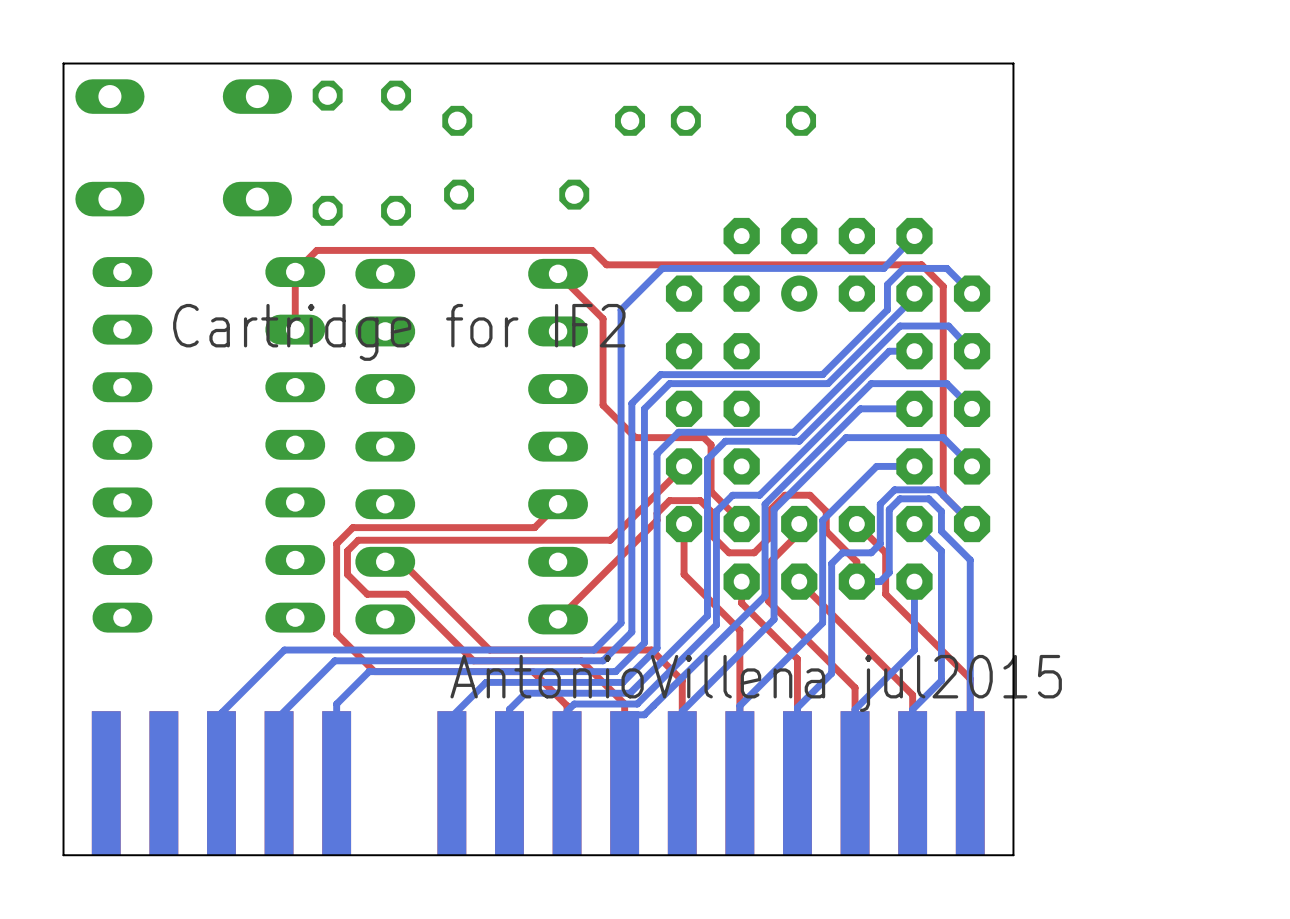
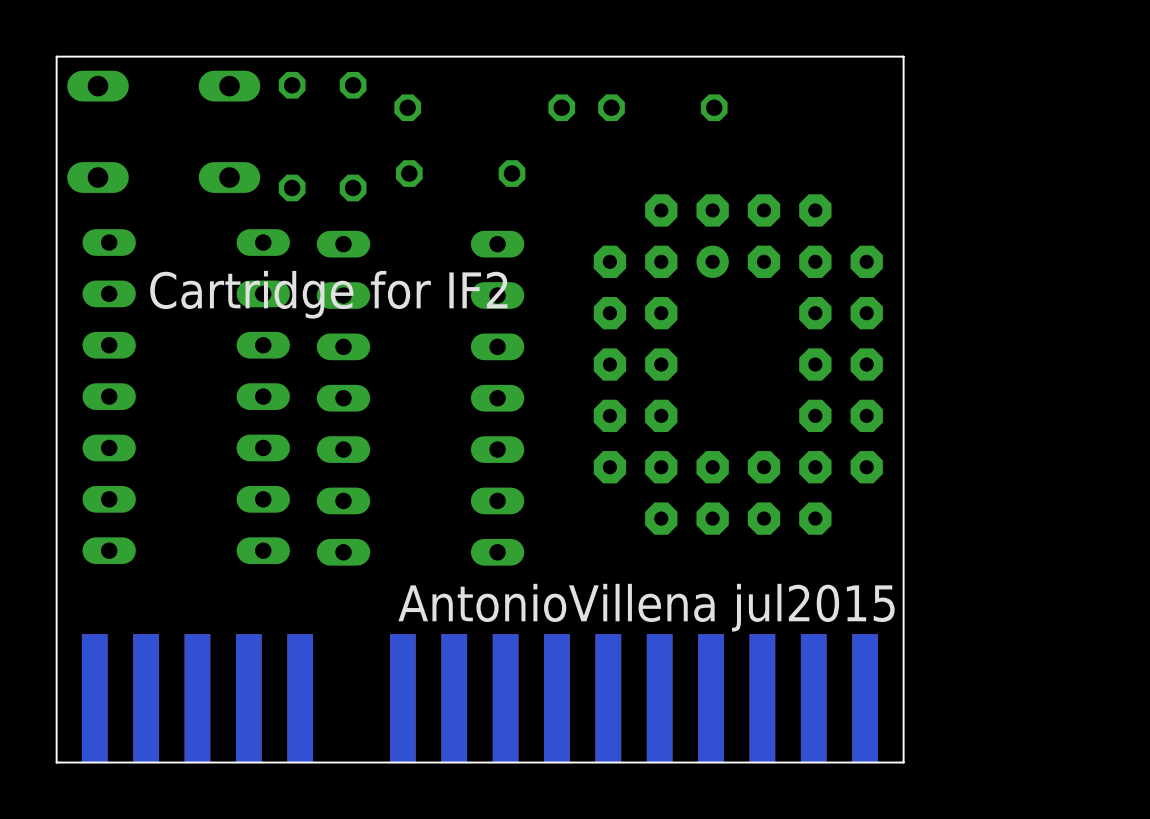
bottom track: (914, 236) (883, 268) (662, 268) (621, 309) (621, 623) (594, 650) (284, 650) (221, 713) (221, 783) -> none
top track: (558, 273) (603, 318) (603, 405) (635, 437) (703, 437) (711, 444) (711, 491) (741, 524) -> none
bottom track: (914, 293) (914, 297) (828, 383) (669, 383) (644, 408) (644, 642) (615, 671) (369, 671) (336, 704) (336, 783) -> none
bottom track: (972, 293) (946, 268) (903, 268) (887, 284) (887, 309) (822, 374) (660, 374) (631, 403) (631, 632) (603, 660) (334, 660) (279, 716) (279, 783) -> none
top track: (295, 329) (295, 272) (316, 250) (592, 250) (606, 264) (921, 264) (943, 286) (943, 495) (972, 524) -> none
bottom track: (914, 351) (889, 351) (799, 441) (725, 441) (707, 459) (707, 615) (630, 693) (525, 693) (509, 709) (509, 783) -> none
bottom track: (972, 351) (948, 326) (900, 326) (793, 432) (678, 432) (657, 453) (657, 648) (622, 682) (486, 682) (451, 716) (451, 783) -> none
bottom track: (914, 408) (860, 408) (765, 504) (765, 596) (644, 714) (624, 714) (624, 783) -> none
bottom track: (972, 408) (946, 383) (871, 383) (759, 495) (732, 495) (716, 511) (716, 624) (637, 704) (574, 704) (567, 711) (567, 783) -> none
top track: (684, 466) (610, 540) (358, 540) (347, 551) (347, 574) (367, 594) (406, 594) (473, 660) (581, 660) (624, 704) (624, 783) -> none
bottom track: (914, 466) (876, 466) (822, 520) (822, 623) (739, 705) (739, 783) -> none
bottom track: (972, 466) (943, 437) (846, 437) (774, 509) (774, 619) (682, 711) (682, 783) -> none
top track: (558, 504) (534, 527) (352, 527) (336, 543) (336, 633) (374, 671) (532, 671) (567, 705) (567, 783) -> none
top track: (684, 524) (684, 574) (739, 630) (739, 783) -> none
top track: (799, 524) (799, 533) (768, 563) (768, 601) (855, 687) (855, 783) -> none
top track: (856, 524) (885, 552) (885, 594) (970, 678) (970, 783) -> none
bottom track: (914, 524) (941, 551) (941, 680) (912, 709) (912, 783) -> none
bottom track: (972, 524) (937, 489) (894, 489) (880, 504) (880, 543) (871, 552) (842, 552) (831, 563) (831, 673) (797, 707) (797, 783) -> none
top track: (385, 561) (401, 561) (489, 650) (651, 650) (682, 680) (682, 783) -> none
top track: (741, 581) (741, 603) (797, 659) (797, 783) -> none
top track: (799, 581) (912, 695) (912, 783) -> none
bottom track: (856, 581) (880, 581) (889, 572) (889, 509) (900, 498) (928, 498) (941, 511) (941, 531) (970, 560) (970, 783) -> none
top track: (856, 581) (856, 561) (826, 531) (826, 511) (810, 495) (784, 495) (768, 511) (768, 538) (754, 552) (729, 552) (711, 534) (711, 511) (700, 500) (669, 500) (657, 513) (657, 520) (558, 619) -> none
bottom track: (914, 581) (914, 650) (855, 709) (855, 783) -> none

